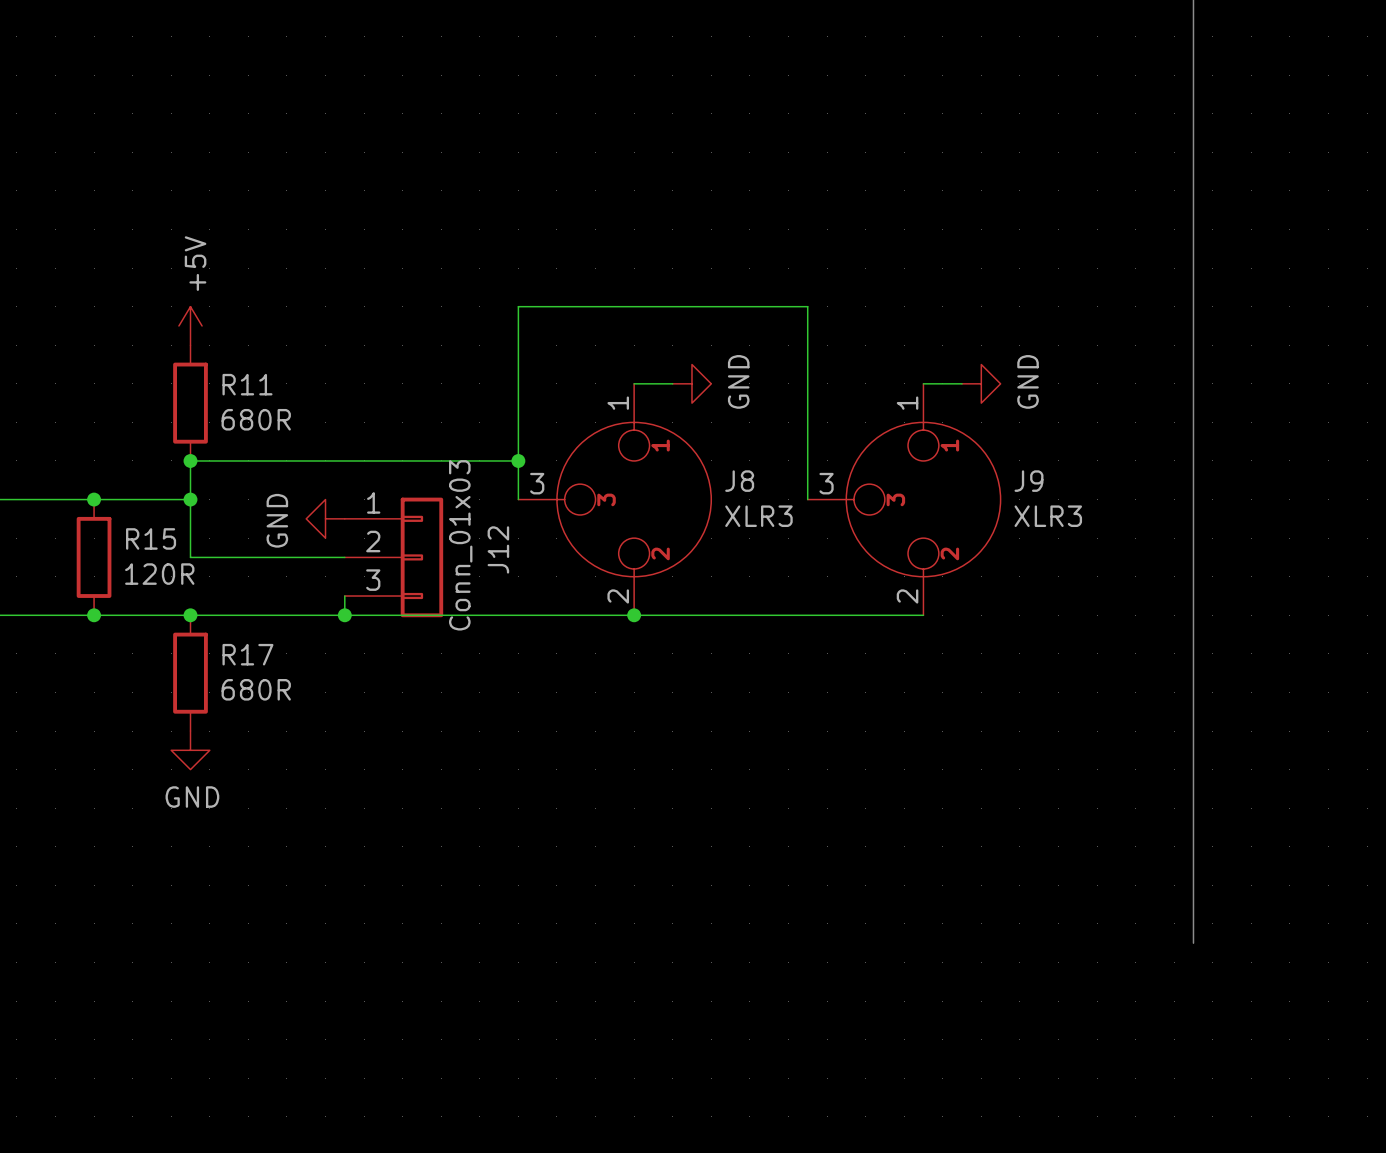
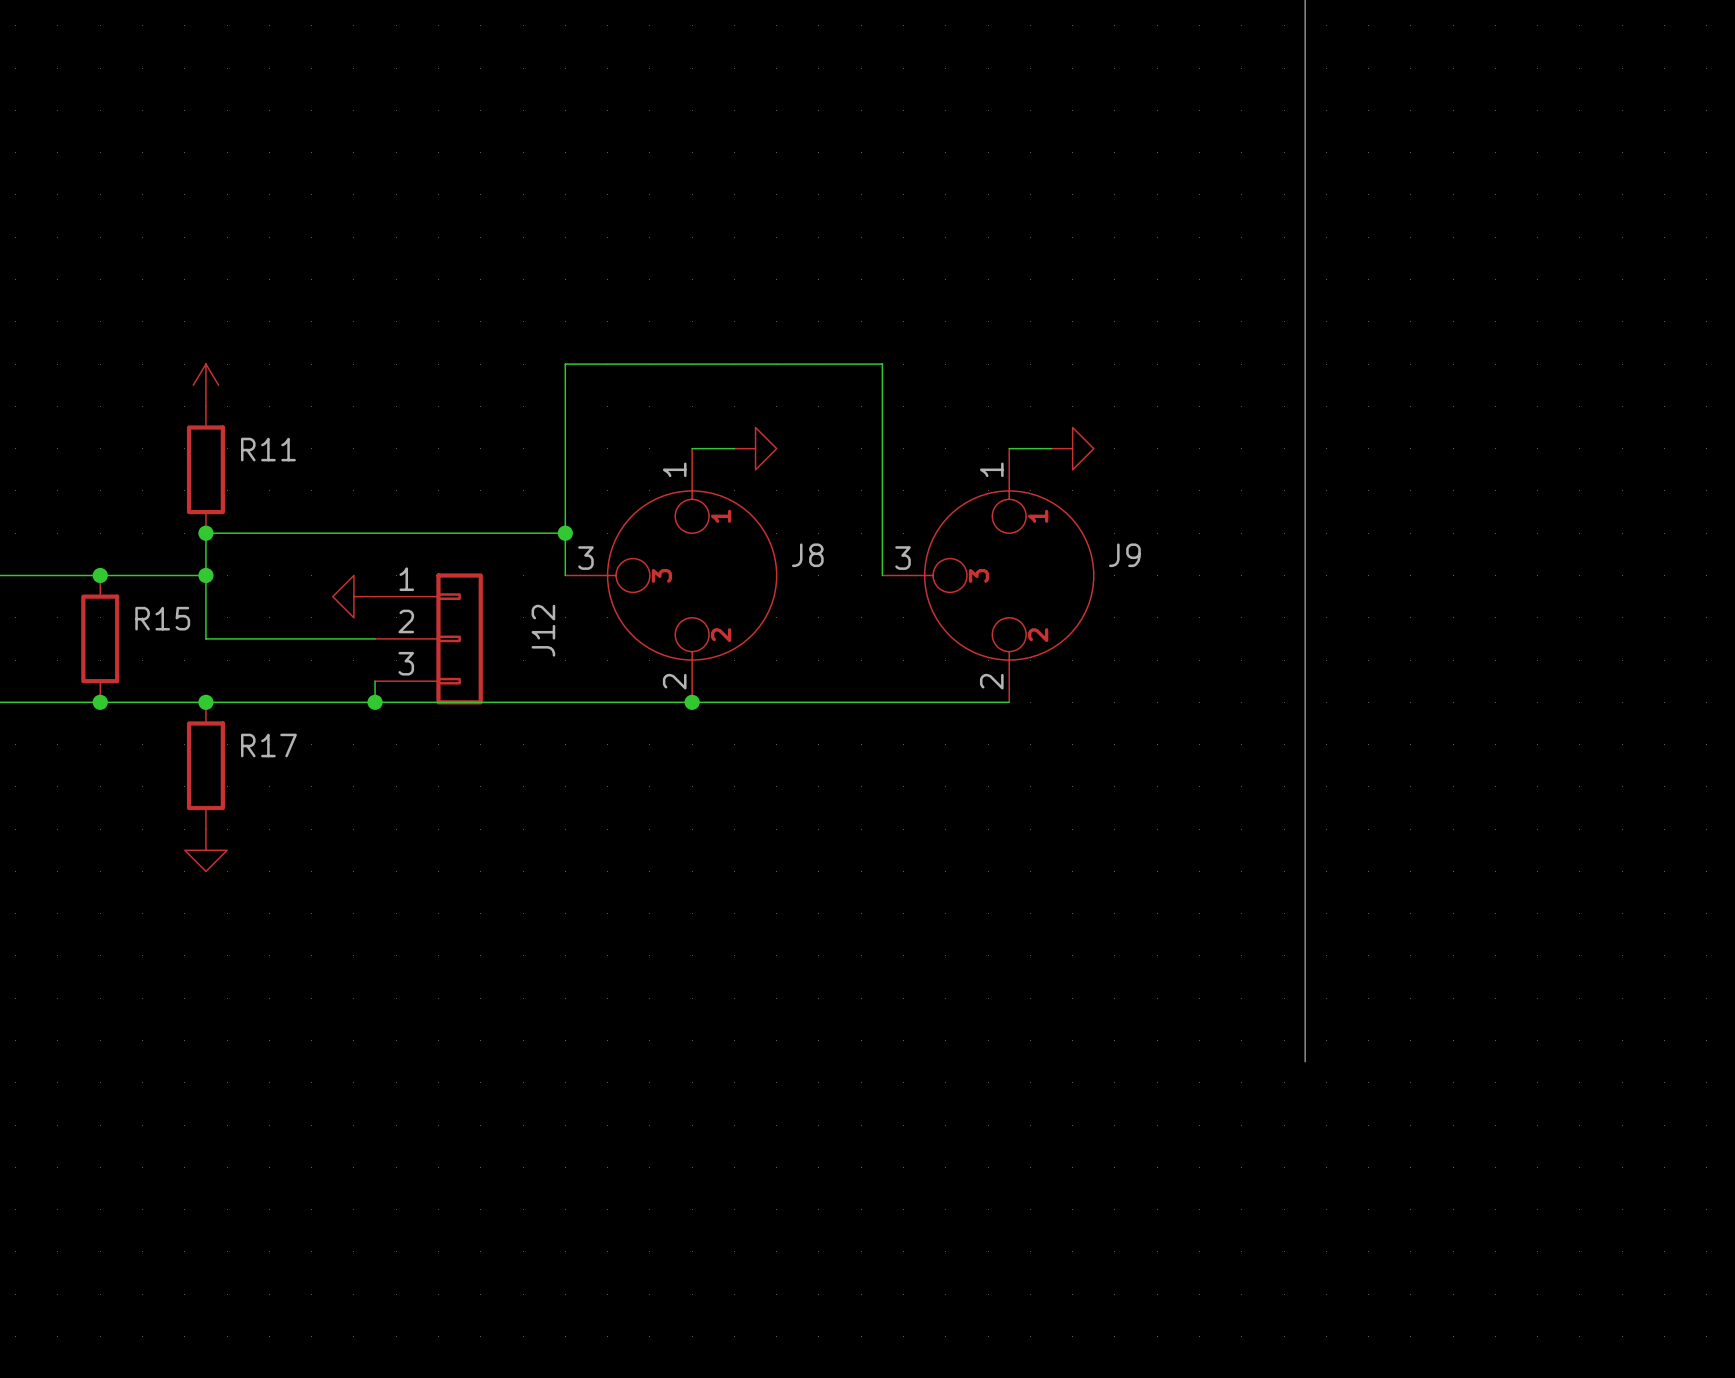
power symbol text: +5V (195, 263) -> none
power symbol text: GND (738, 381) -> none
power symbol text: GND (1028, 381) -> none
R11 value: 680R (256, 419) -> none
J8 value: XLR3 (758, 516) -> none
J9 value: XLR3 (1048, 516) -> none
power symbol text: GND (277, 520) -> none
J12 value: Conn_01x03 (460, 545) -> none
R15 value: 120R (159, 574) -> none
R17 value: 680R (256, 689) -> none
power symbol text: GND (192, 797) -> none

